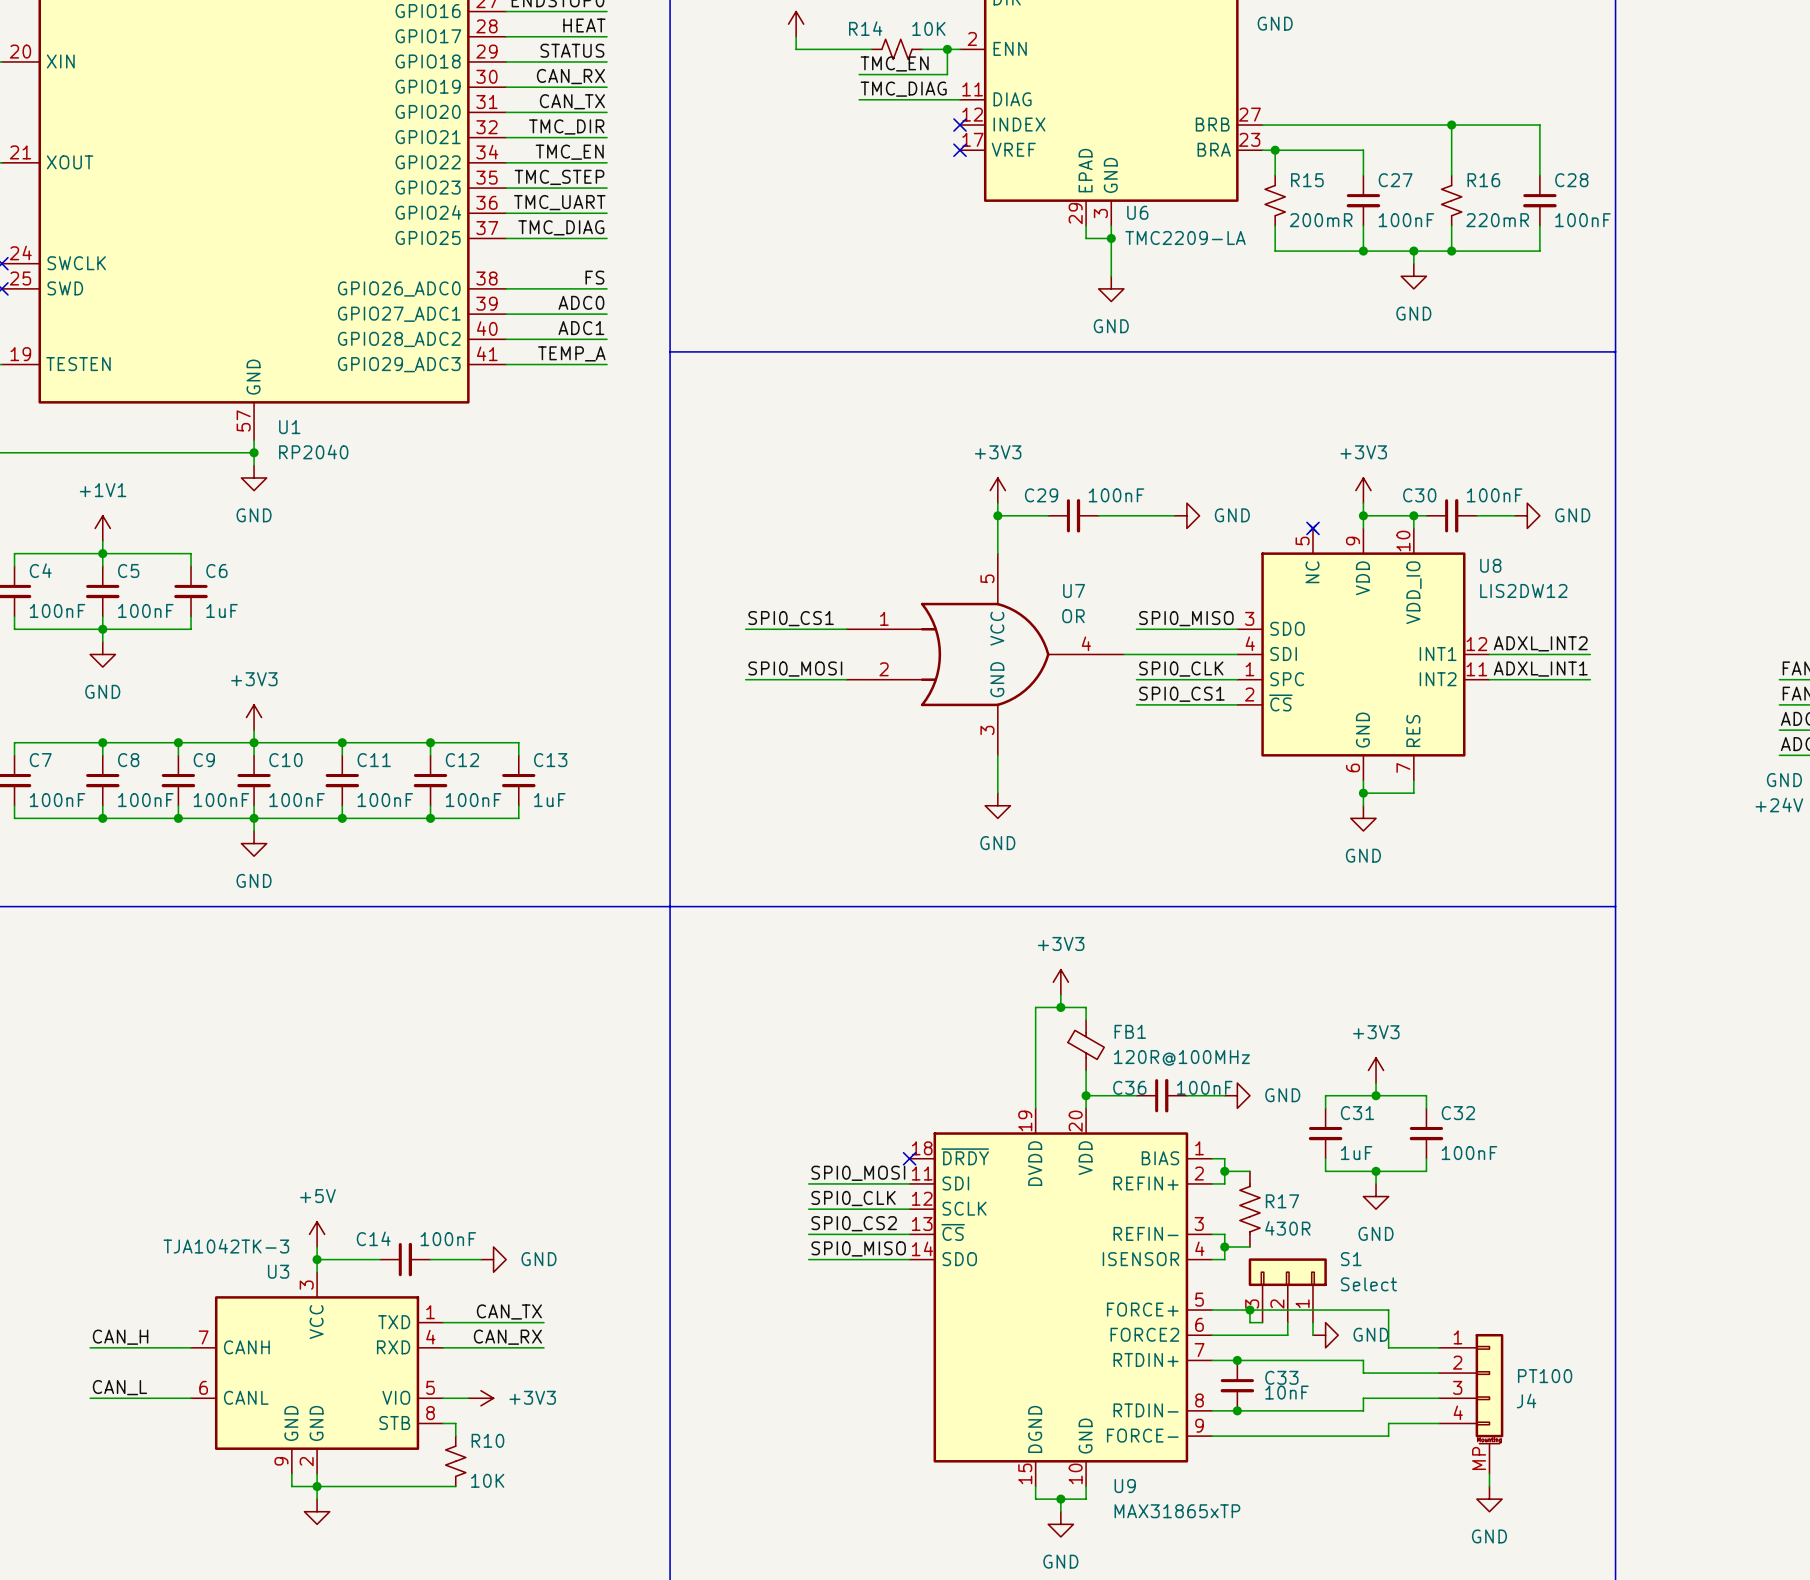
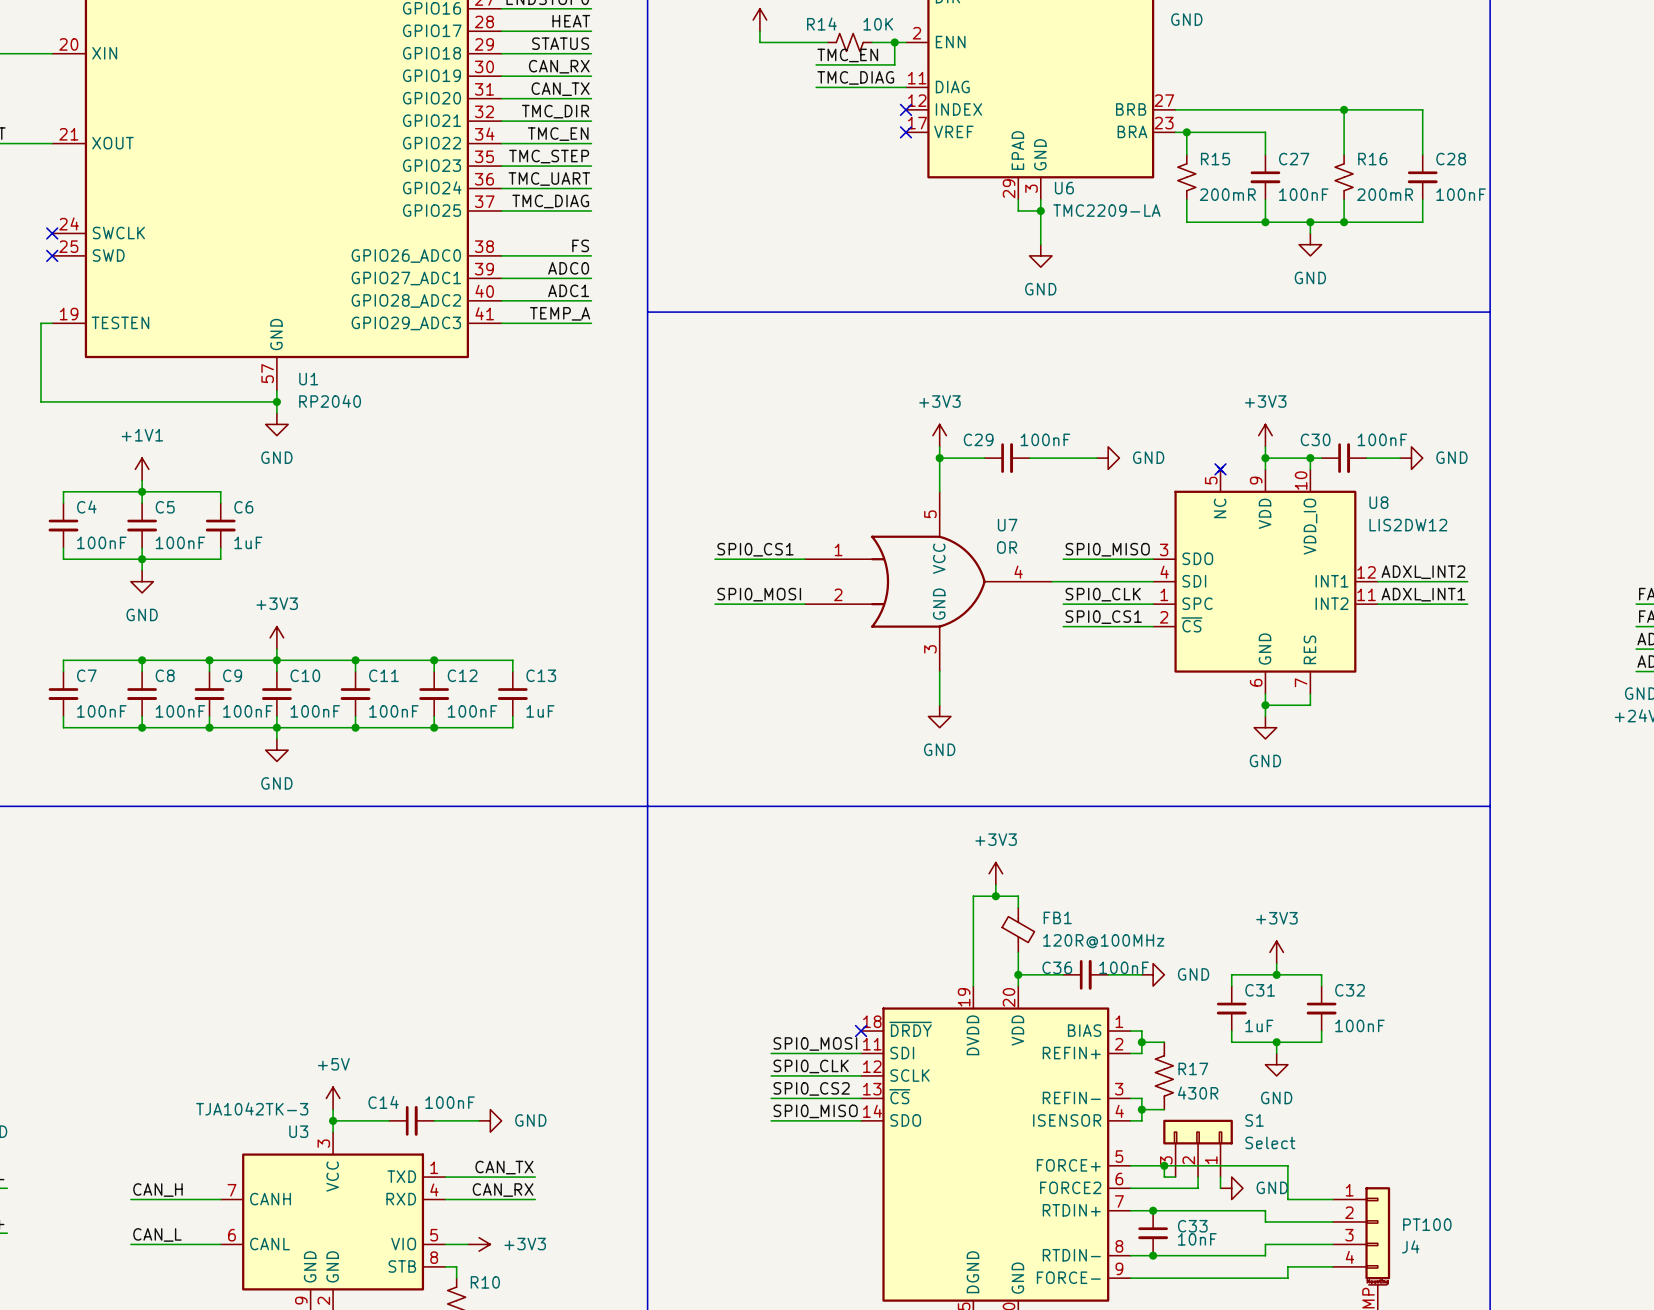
R16 value: 220mR (1497, 220) -> 200mR (1385, 194)

